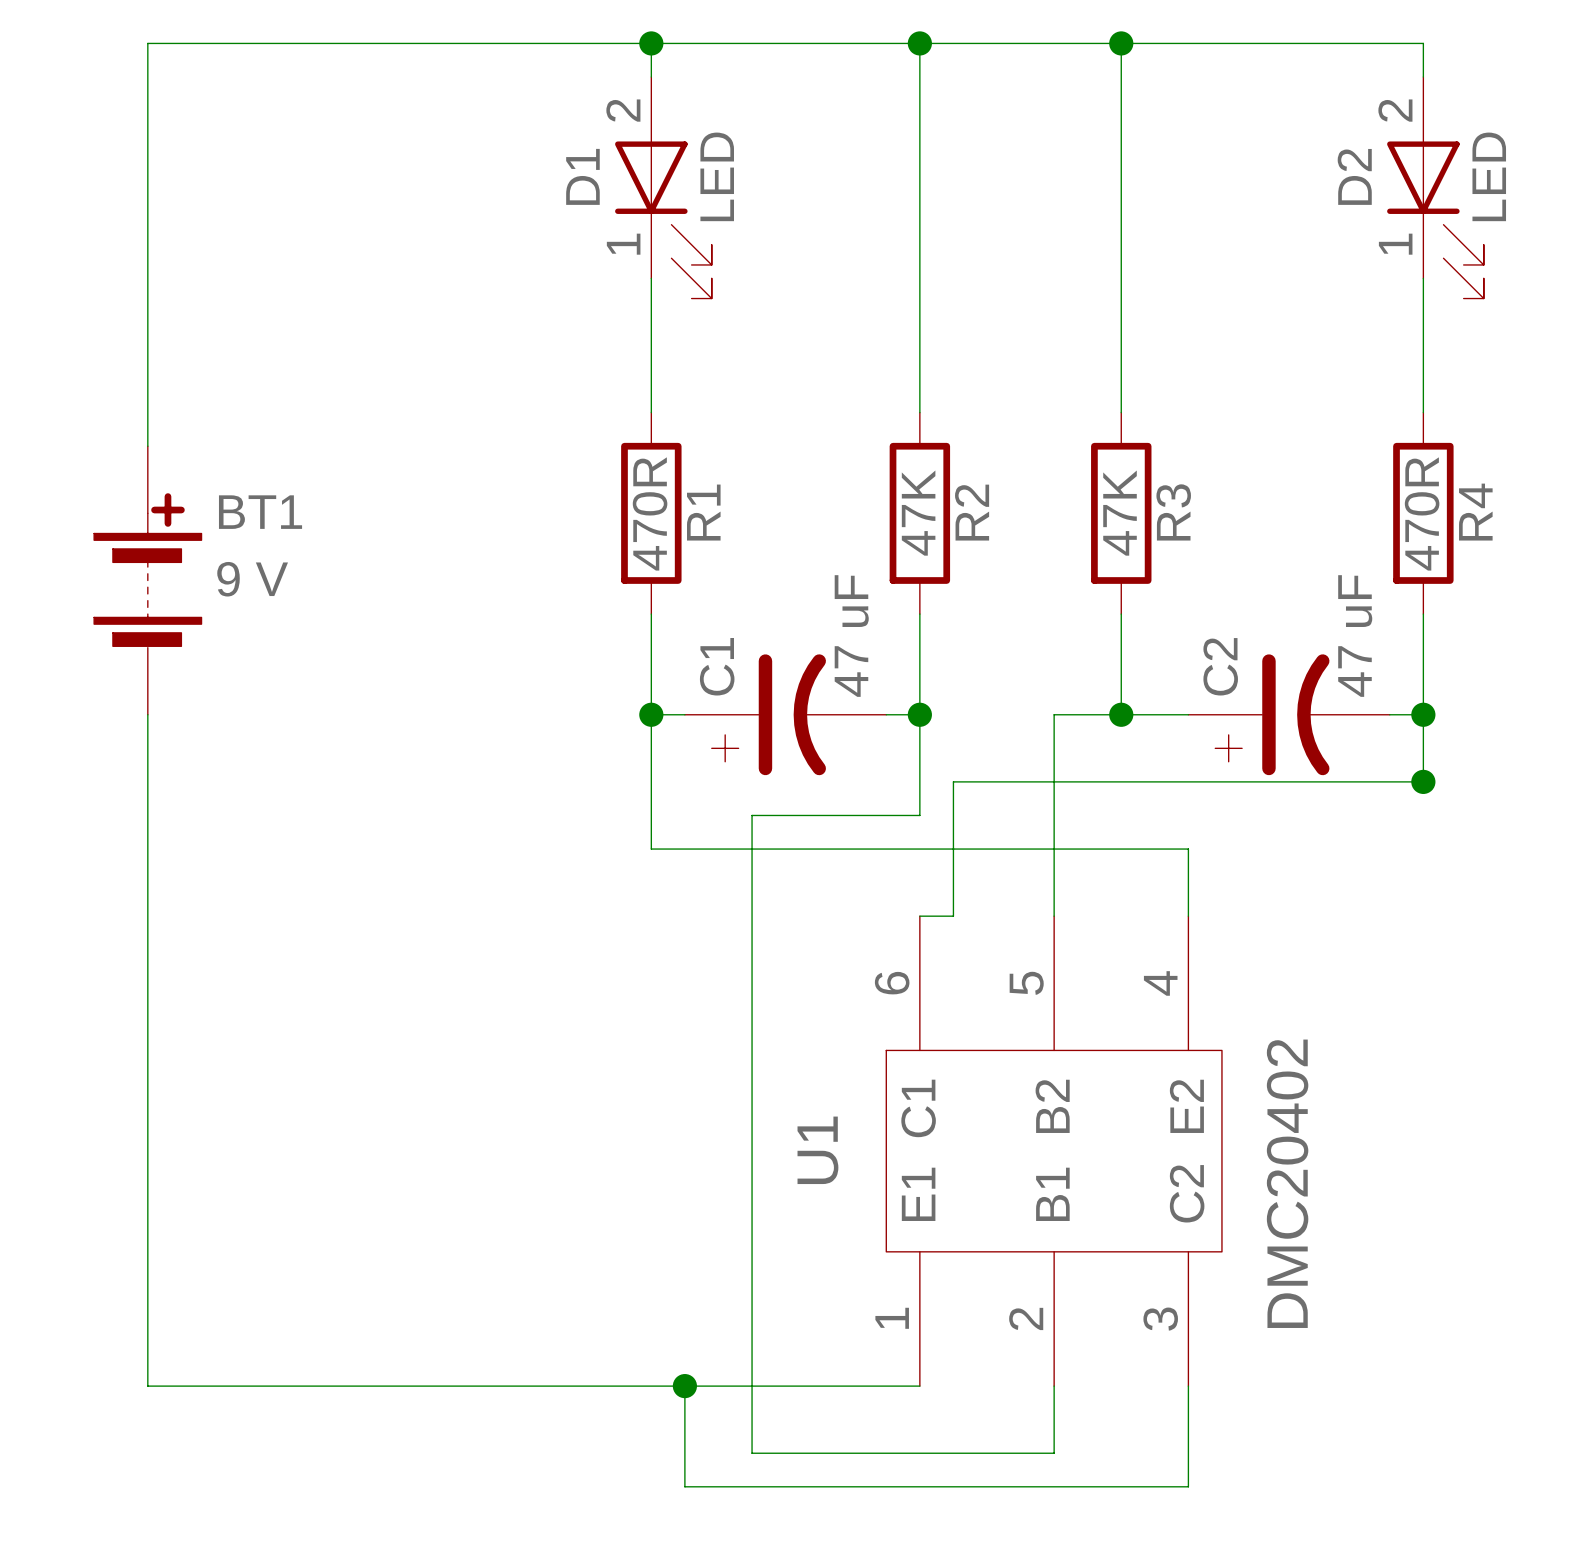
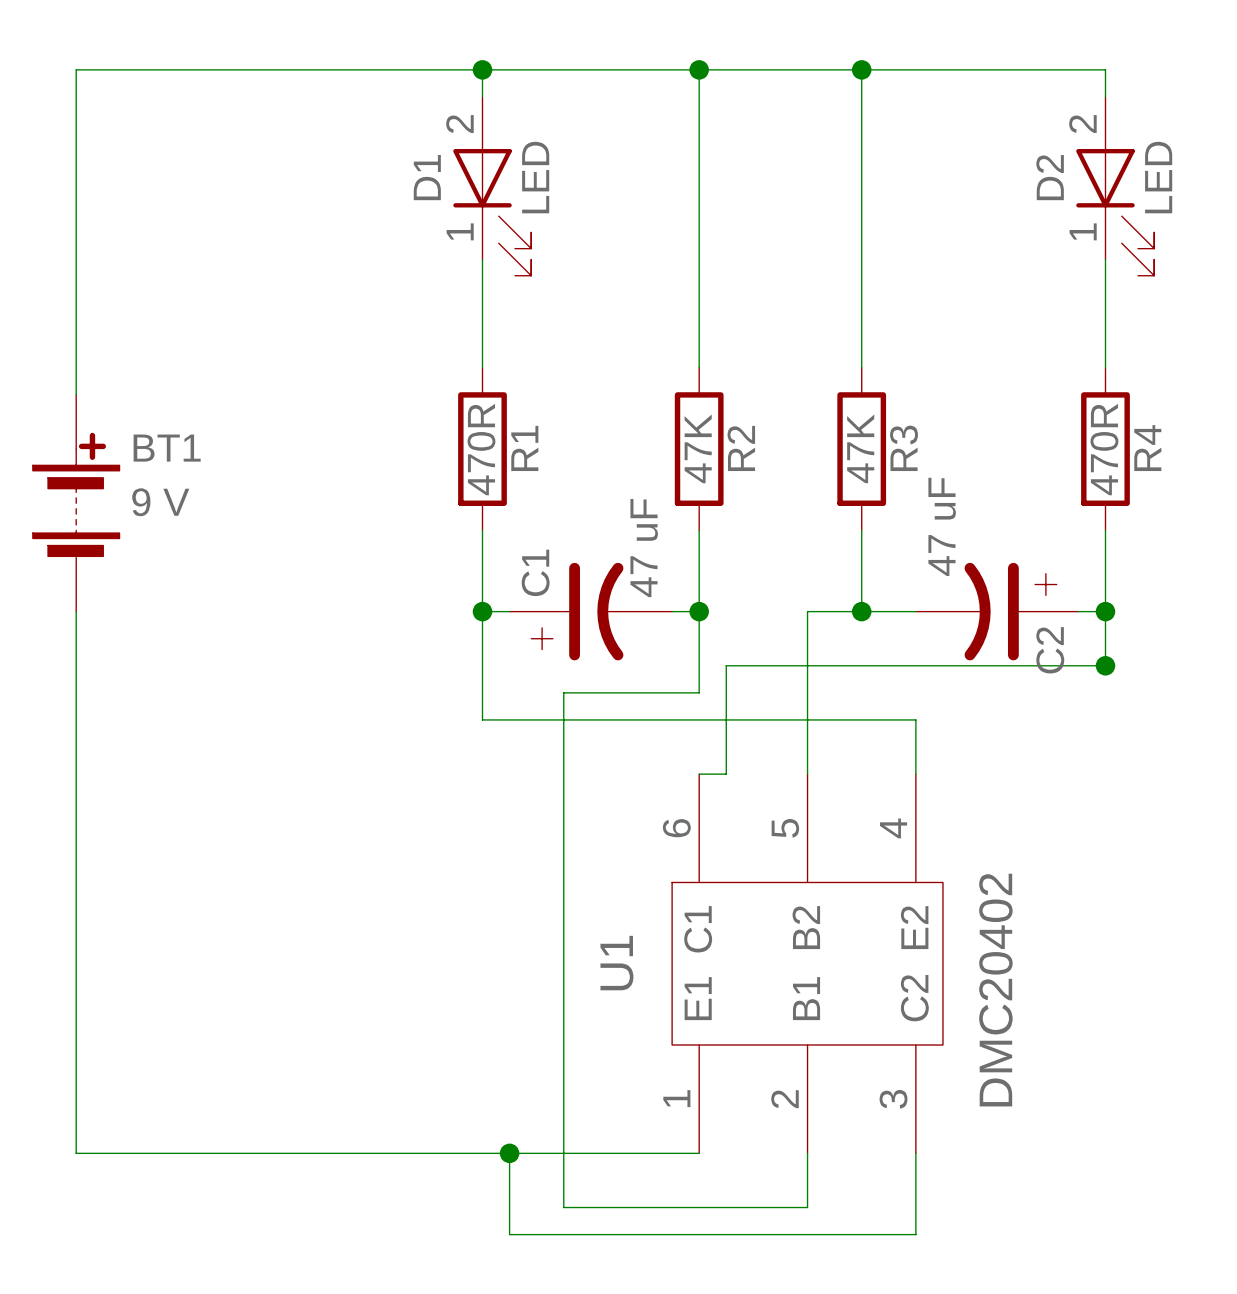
C2 value position: 47 uF (1355, 636) -> 47 uF (942, 526)
C2 rotation: 0° (1272, 714) -> 180° (1010, 611)

